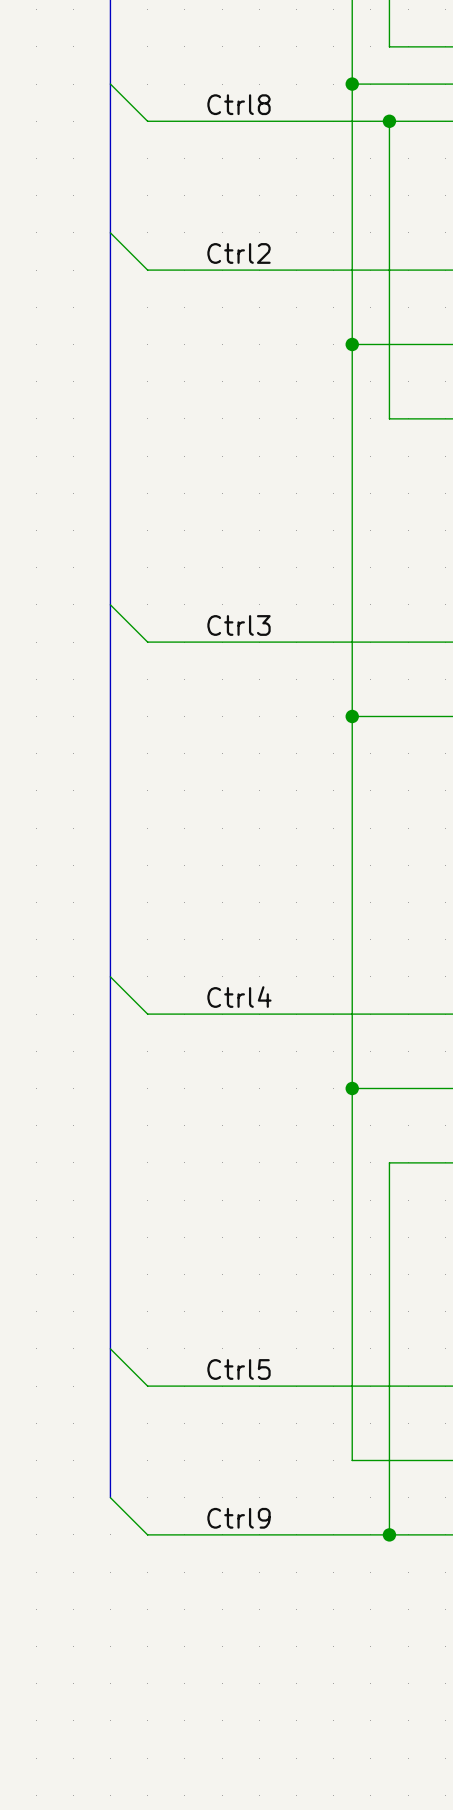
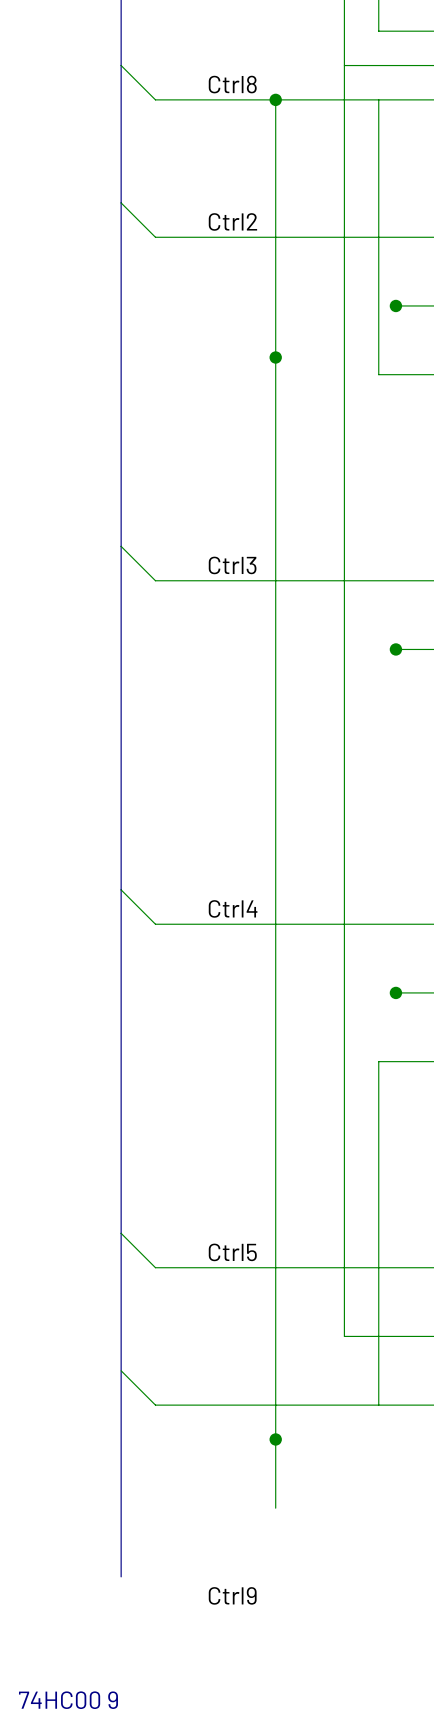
junction: (352, 84) -> none
wire: none -> (275, 99) (275, 1508)
junction: none -> (275, 99)
junction: (389, 121) -> none
wire: (352, 344) (408, 344) -> none
junction: (352, 344) -> none
junction: none -> (395, 305)
junction: none -> (275, 357)
wire: (352, 716) (408, 716) -> none
junction position: (352, 716) -> (395, 649)
wire: (352, 1088) (408, 1088) -> none
junction position: (352, 1088) -> (395, 992)
bus: none -> (121, 1370) (121, 1576)
label position: Ctrl9 (239, 1518) -> Ctrl9 (232, 1595)
junction: (389, 1534) -> none
junction: none -> (275, 1439)

